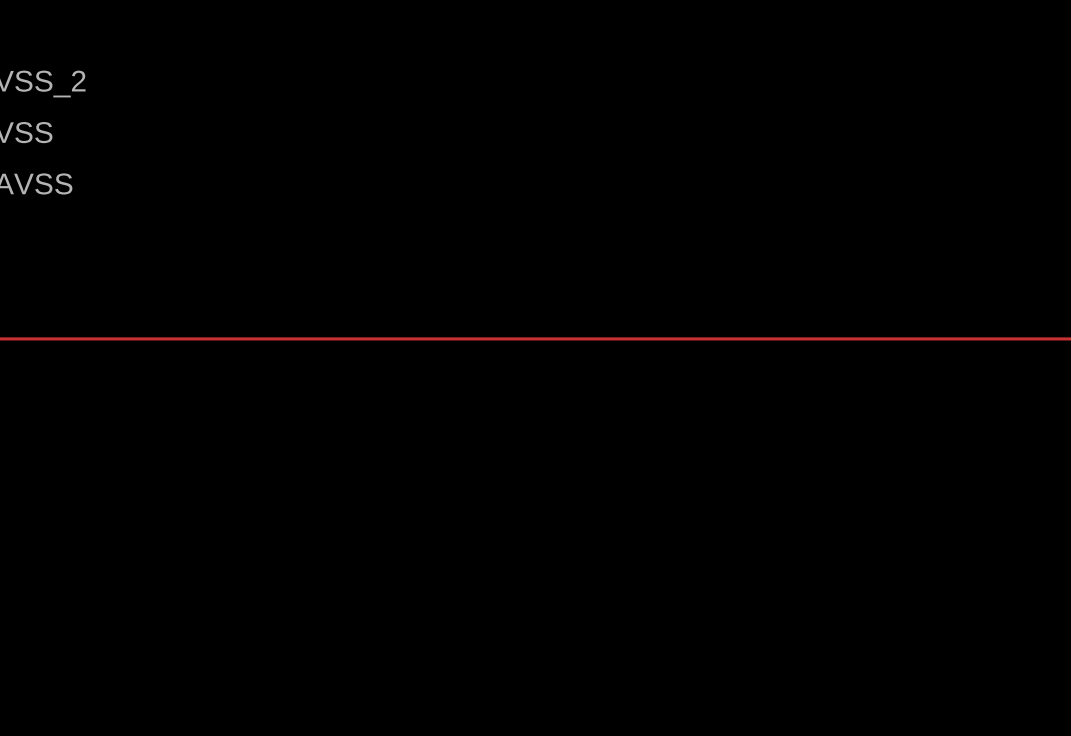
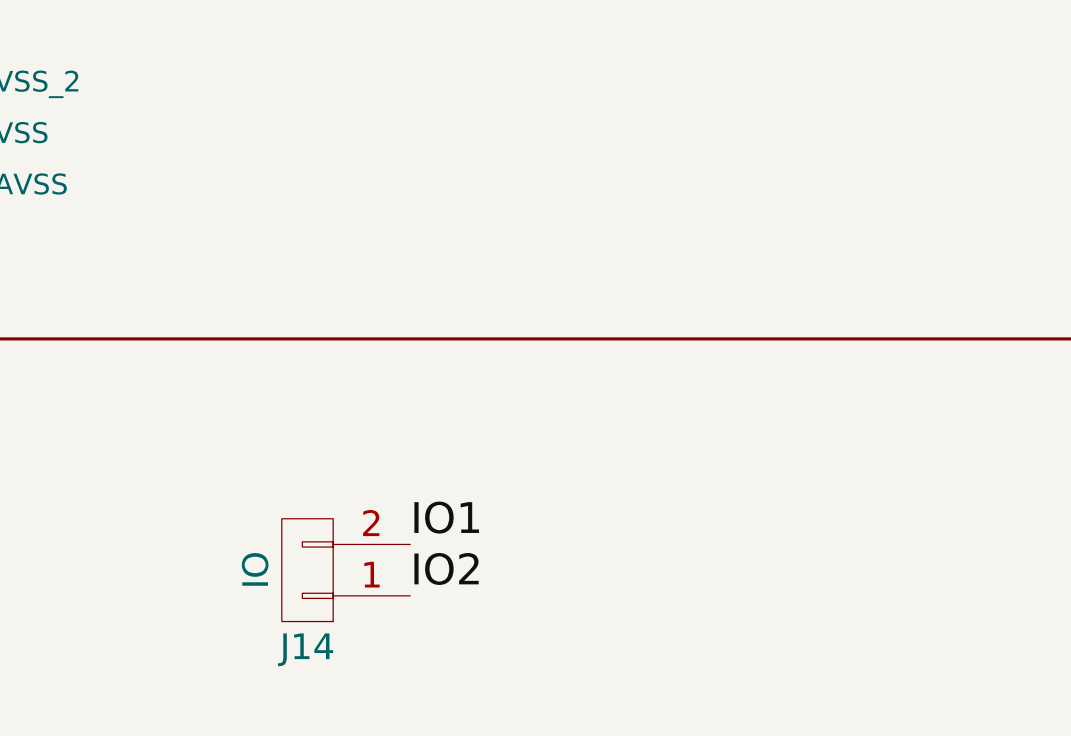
label: none -> IO1 (446, 517)
label: none -> IO2 (446, 568)
J14: none -> IO (346, 570)

